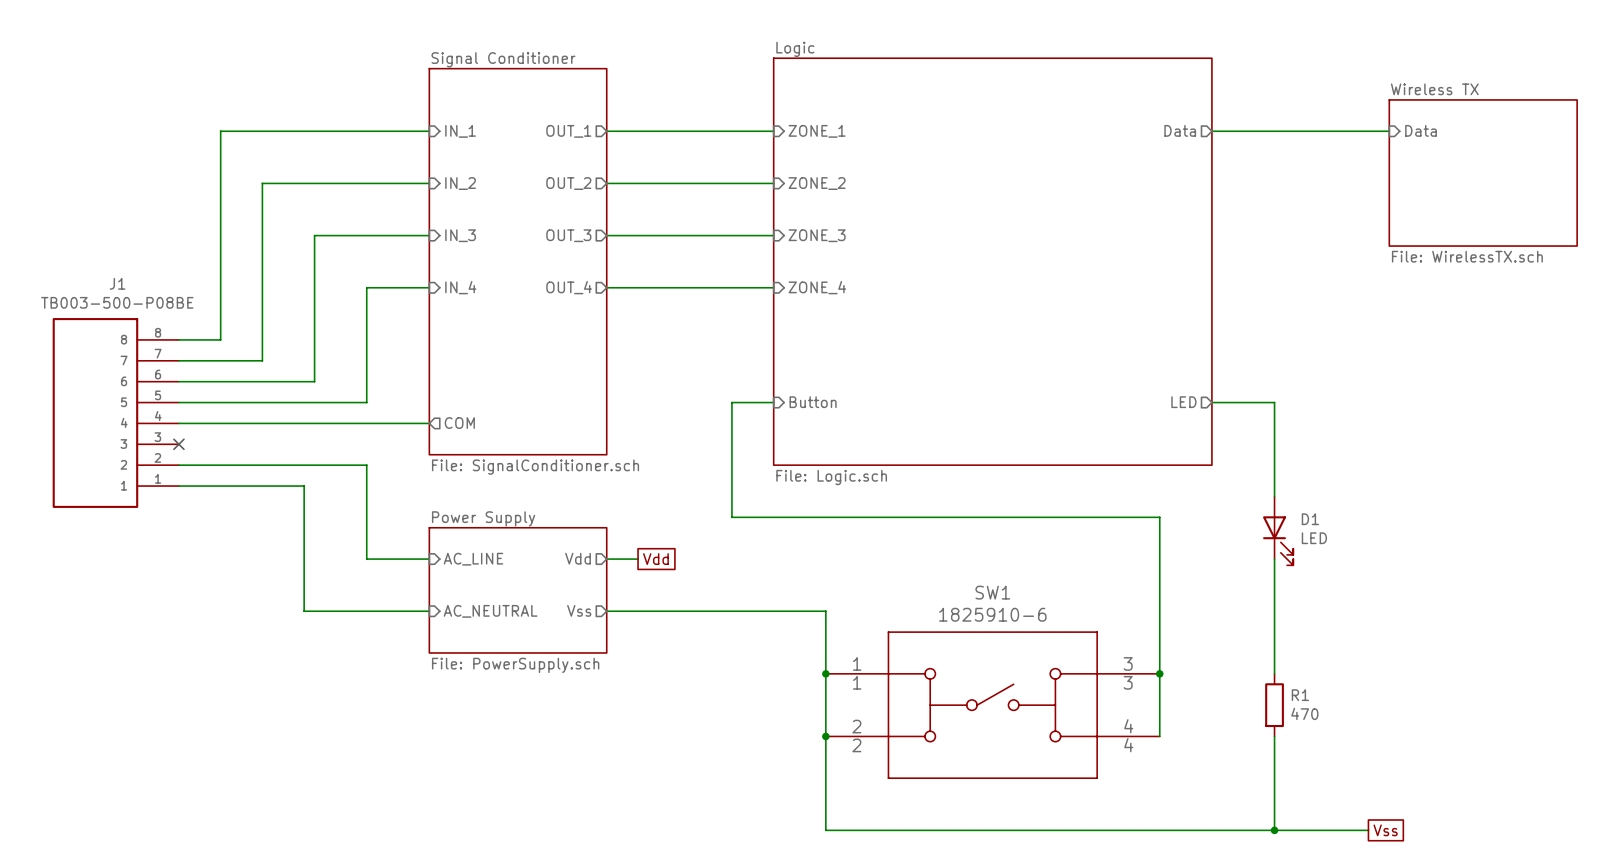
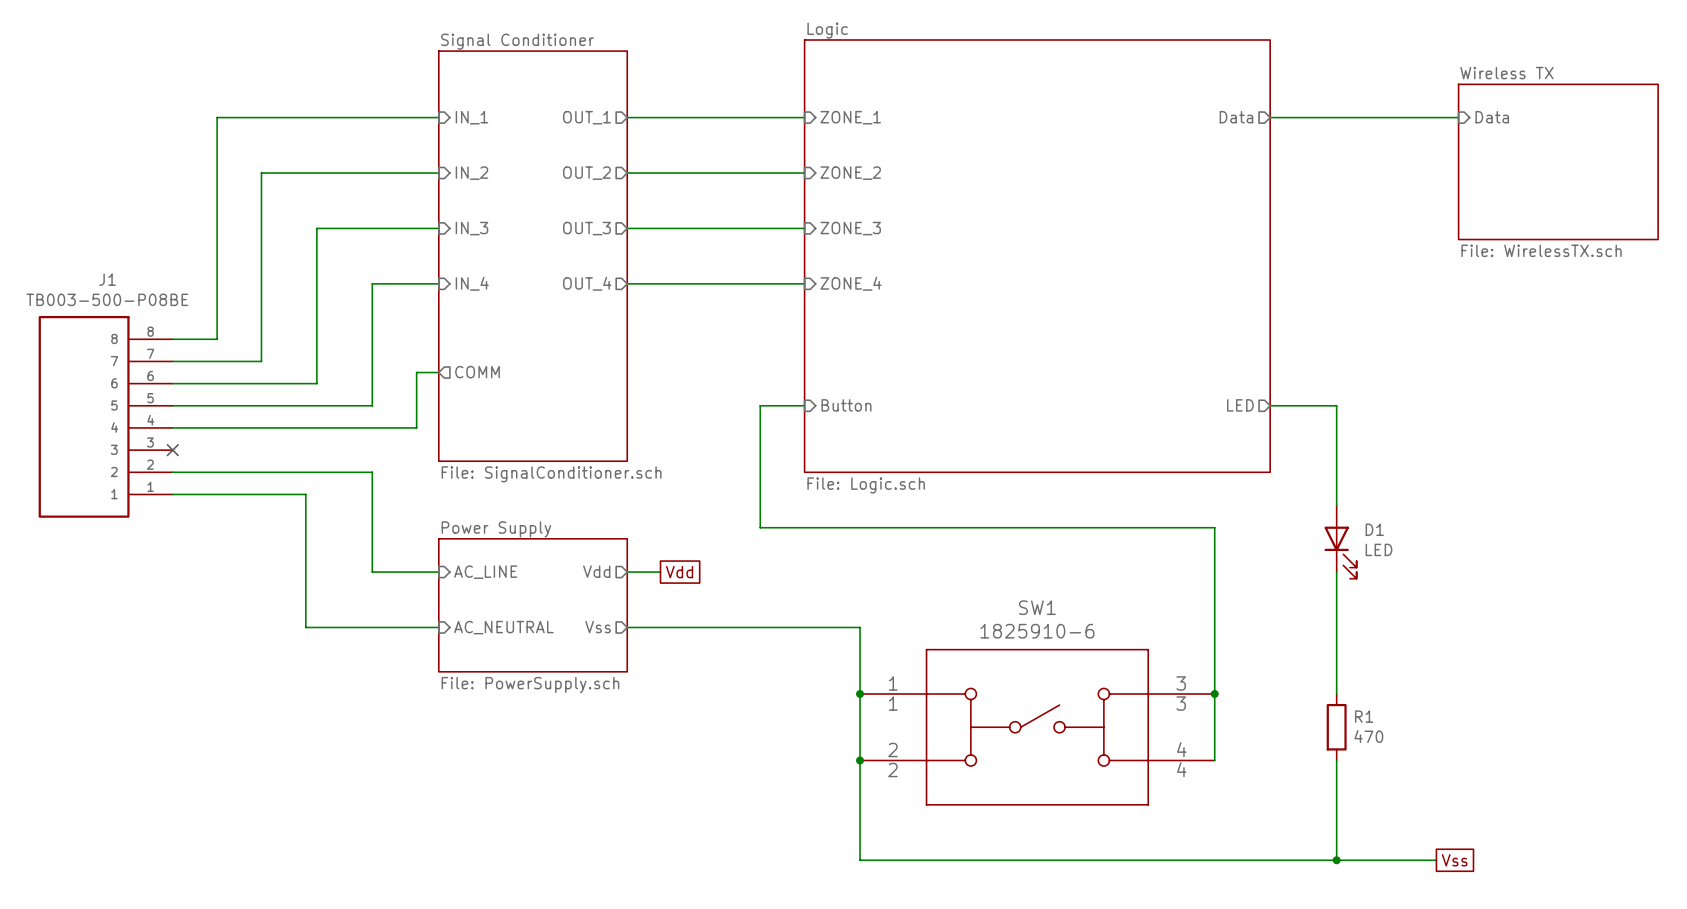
sheet pin: none -> COMM (477, 372)
wire: (408, 423) (429, 423) -> (416, 427) (416, 372) (438, 372)
sheet pin: COM (459, 423) -> none

